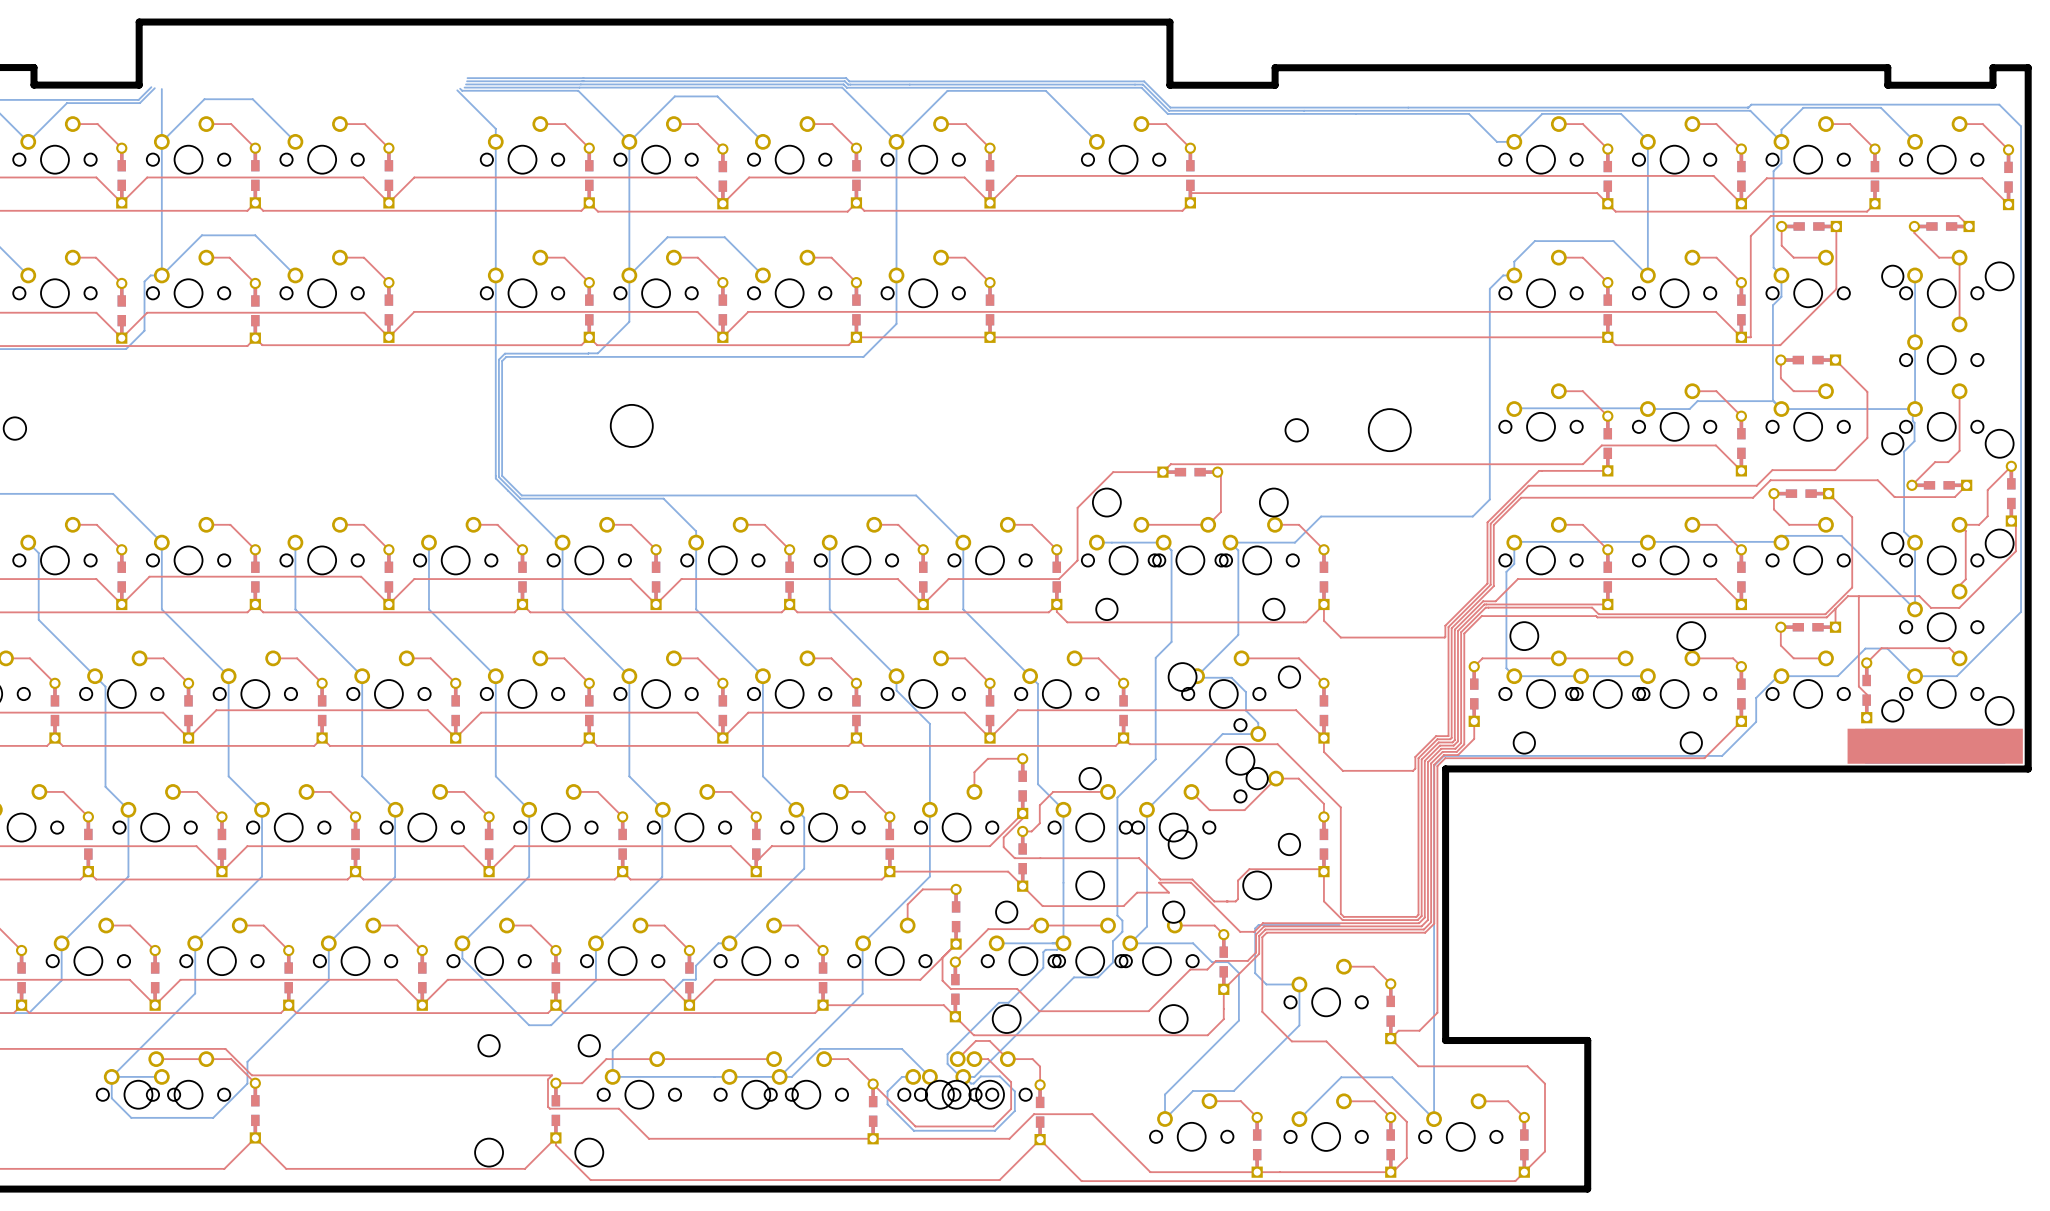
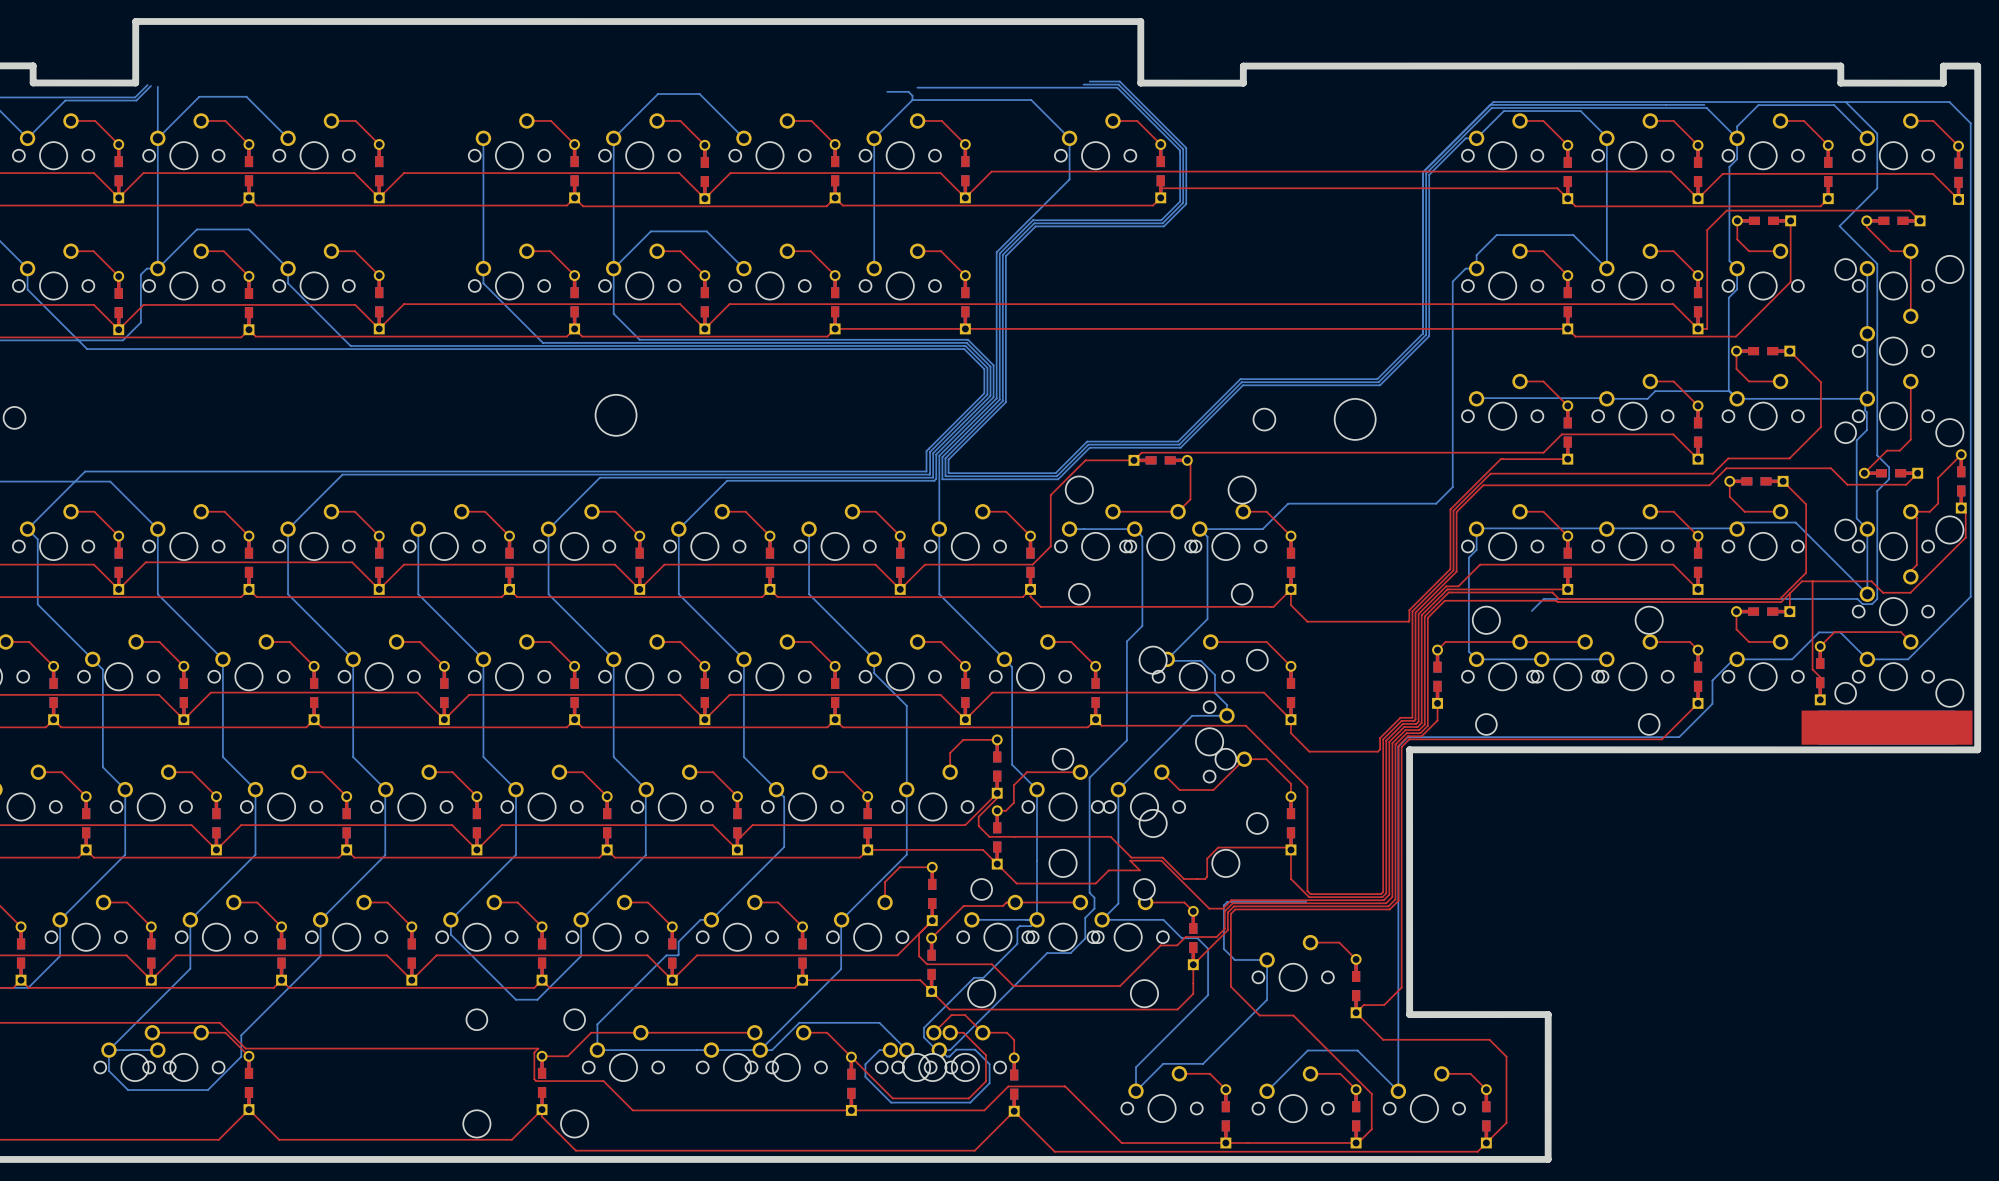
bottom track: (467, 78) (846, 78) (849, 81) (1144, 81) (1170, 107) (1528, 107) -> none
bottom track: (467, 81) (844, 81) (848, 84) (1142, 84) (1169, 110) (1529, 110) -> (1083, 84) (1118, 84) (1183, 149) (1183, 202) (1162, 223) (1034, 223) (1002, 254) (1002, 400) (945, 458) (945, 476) (1056, 476) (1088, 444) (1179, 444) (1241, 382) (1378, 382) (1426, 334) (1426, 173) (1491, 107)
bottom track: none -> (1089, 81) (1119, 81) (1186, 147) (1186, 204) (1163, 226) (1035, 226) (1005, 256) (1005, 402) (948, 459) (948, 473) (1055, 473) (1087, 441) (1178, 441) (1240, 379) (1377, 379) (1422, 333)
bottom track: (465, 84) (843, 84) (846, 87) (1141, 87) (1167, 113) (1468, 113) (1496, 141) (1503, 141) -> (1180, 152) (1180, 201) (1161, 220) (1033, 220) (999, 253) (999, 399) (942, 457) (942, 479) (1058, 479) (1089, 447) (1180, 447) (1243, 385) (1380, 385) (1429, 336) (1429, 174) (1465, 138)
bottom track: (464, 87) (842, 87) (896, 141) -> none
bottom track: (460, 88) (462, 90) (578, 90) (629, 141) -> none
bottom track: none -> (917, 87) (1117, 87) (1180, 152)
bottom track: (457, 90) (495, 128) (495, 141) -> none
bottom track: (935, 102) (947, 90) (1045, 90) (1057, 102) -> (887, 91) (908, 91) (912, 95) (912, 100) (1031, 100)
bottom track: (1751, 104) (1747, 107) -> (1707, 102) (1493, 102) (1423, 172) (1423, 333)
bottom track: none -> (1845, 102) (1877, 133) (1877, 188) (1839, 226) (1877, 263) (1877, 455) (1889, 467) (1889, 479) (1877, 490) (1877, 598) (1872, 604) (1862, 604) (1857, 598) (1543, 598) (1531, 610)
bottom track: none -> (27, 268) (27, 289) (87, 349) (964, 349) (984, 369) (984, 393) (926, 451) (926, 471) (85, 471) (27, 529)
bottom track: none -> (288, 268) (288, 283) (350, 345) (965, 345) (987, 367) (987, 394) (930, 451) (930, 473)
bottom track: (896, 275) (896, 323) (863, 356) (506, 356) (502, 361) (502, 475) (521, 495) (916, 495) (963, 542) -> (1069, 138) (1069, 179) (996, 252) (996, 398) (939, 455) (939, 529)
bottom track: (495, 290) (495, 478) (559, 542) -> (483, 283) (542, 342) (966, 342) (990, 366) (990, 395) (933, 453) (933, 477)
bottom track: (629, 321) (597, 353) (504, 353) (498, 359) (498, 477) (520, 498) (663, 498) (696, 531) (696, 542) -> (613, 313) (639, 339) (968, 339) (993, 365) (993, 397) (936, 454) (936, 478) (934, 480) (727, 480) (678, 529)
bottom track: none -> (930, 473) (342, 474) (288, 529)
bottom track: none -> (933, 477) (599, 477) (548, 529)

